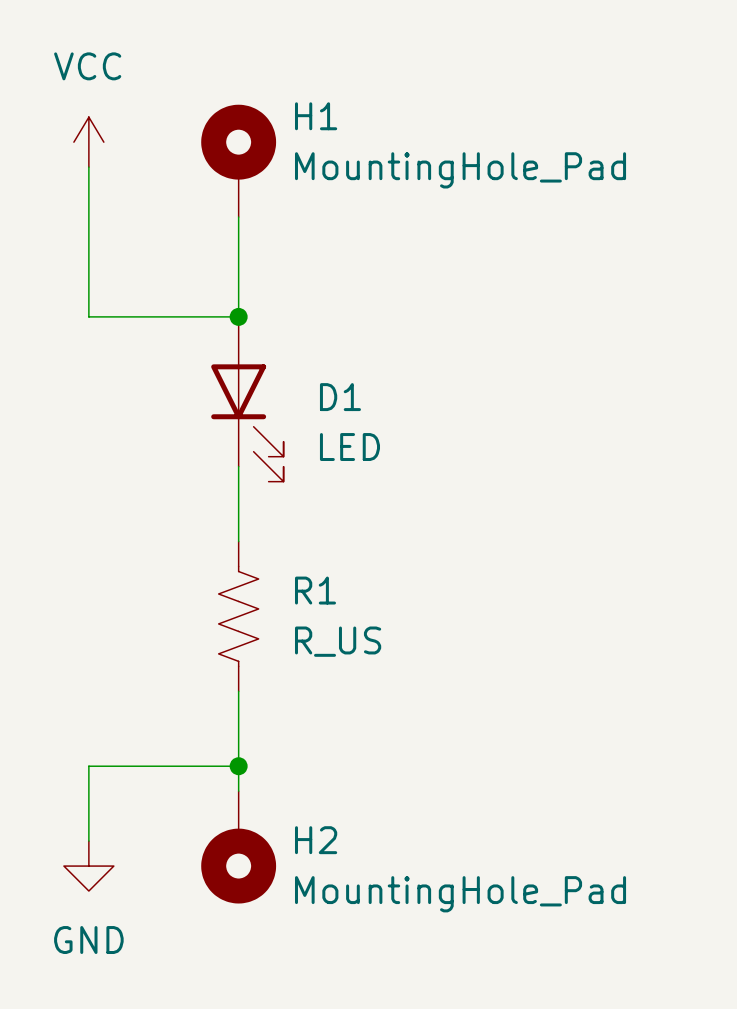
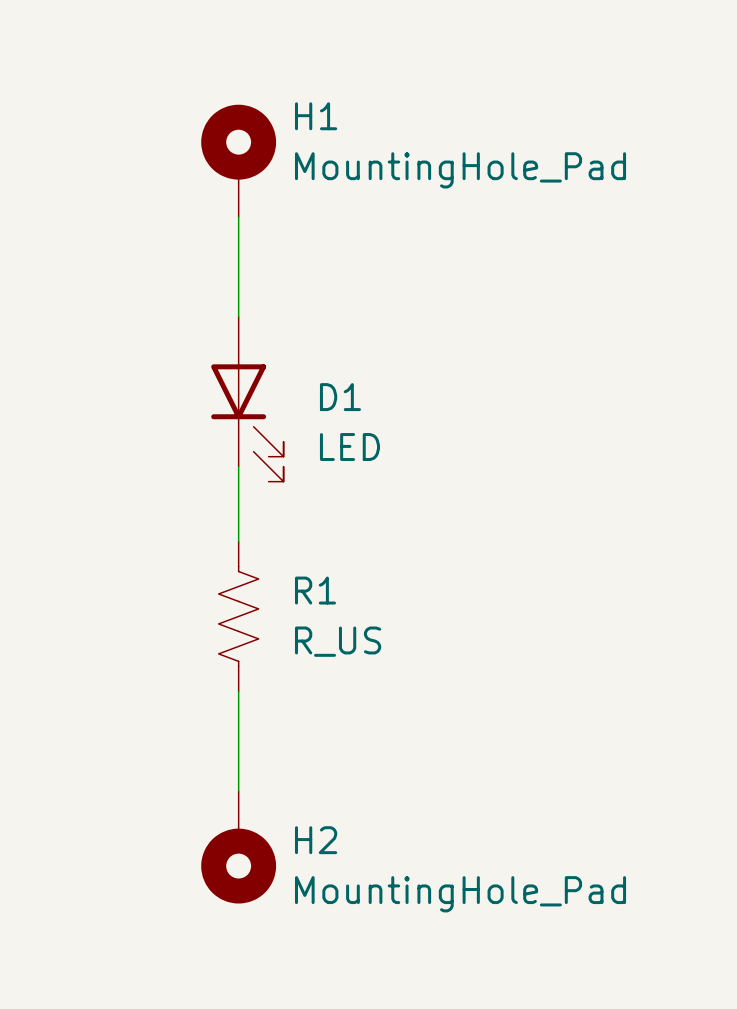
power symbol: VCC (88, 142) -> none
wire: (88, 167) (88, 316) (238, 316) -> none
junction: (238, 316) -> none
wire: (238, 766) (88, 766) (88, 841) -> none
junction: (238, 766) -> none
power symbol: GND (88, 866) -> none

